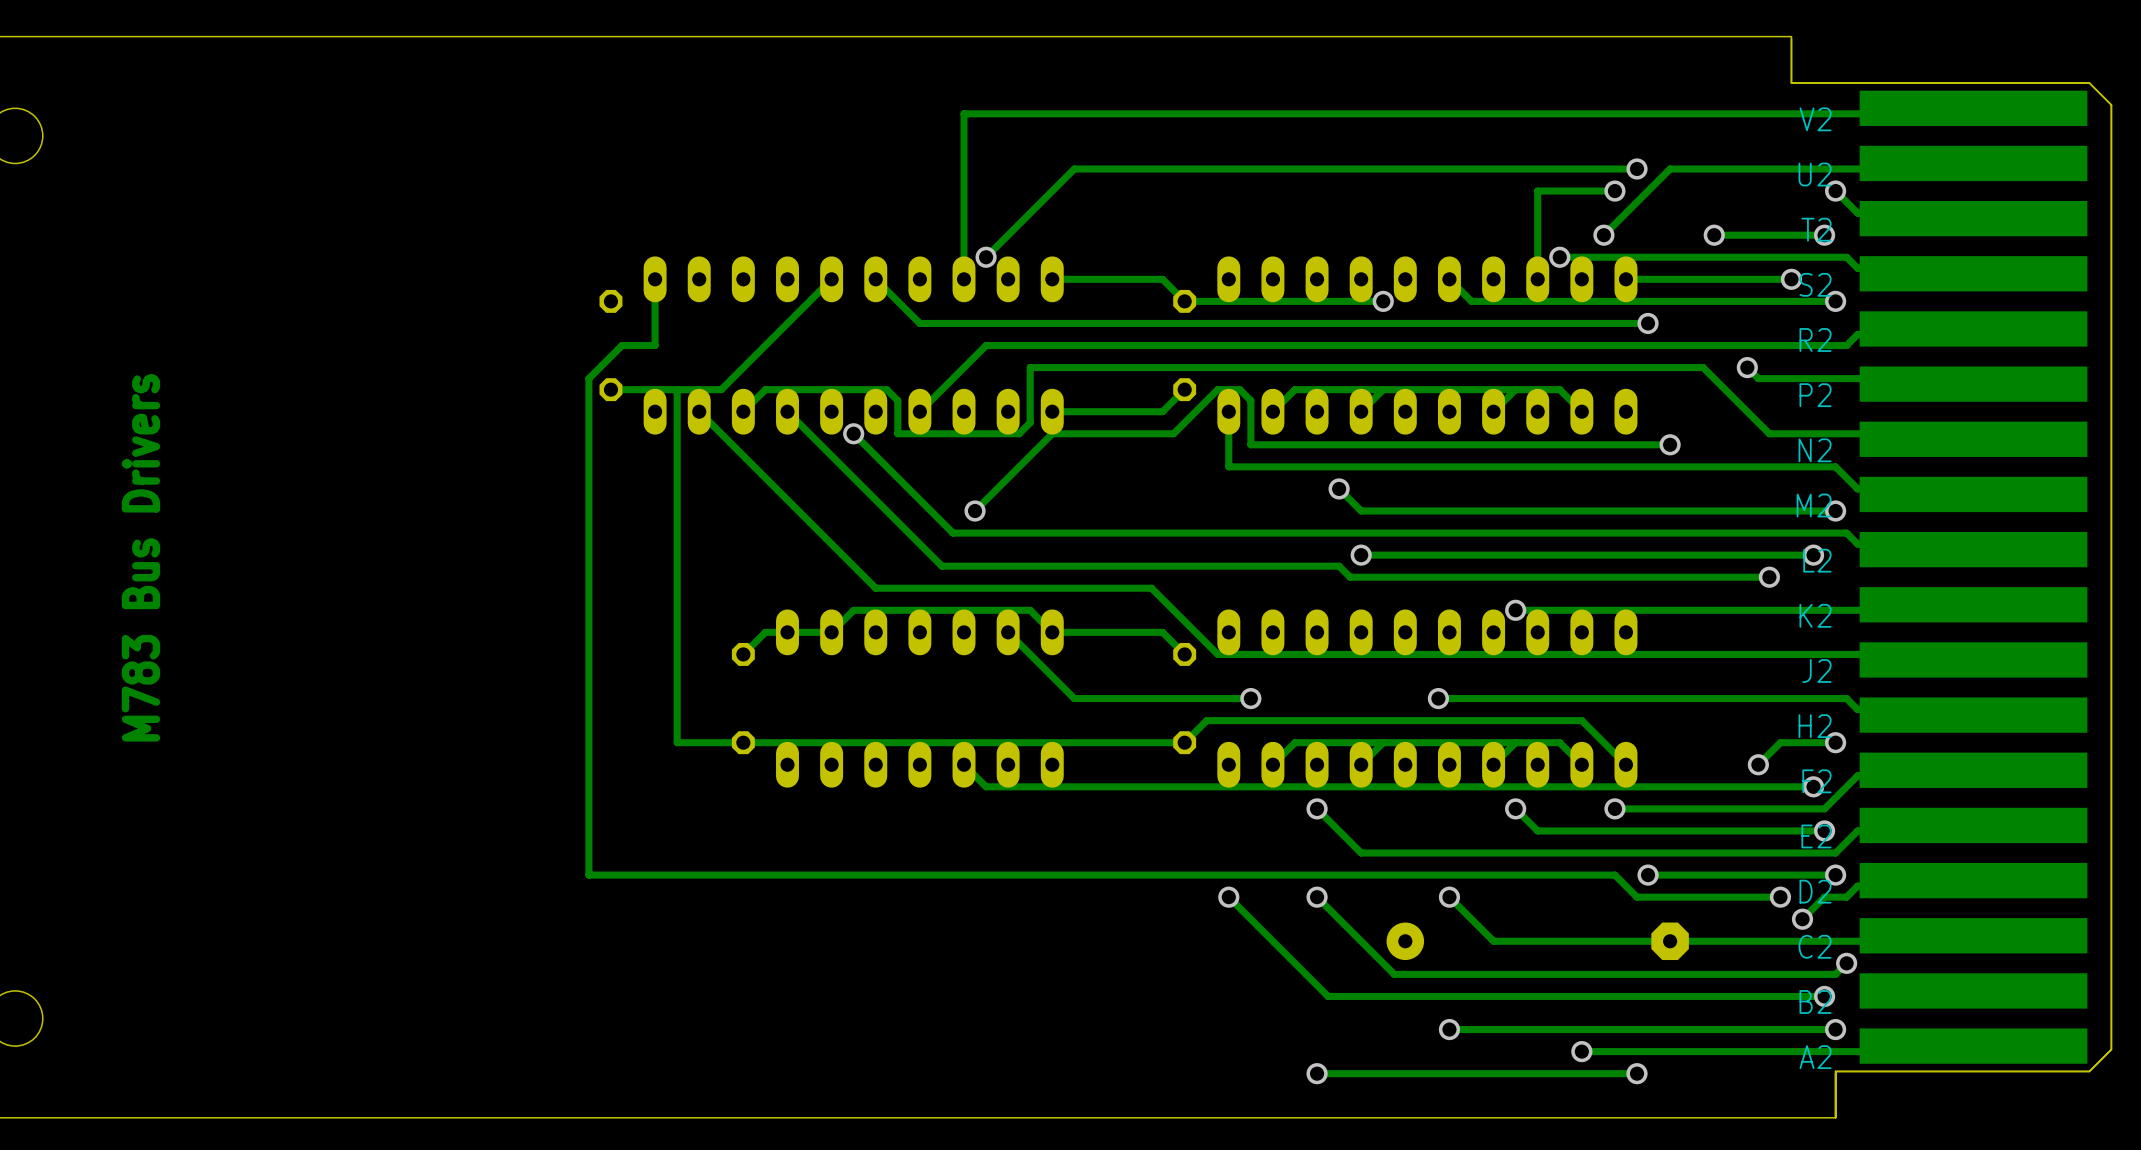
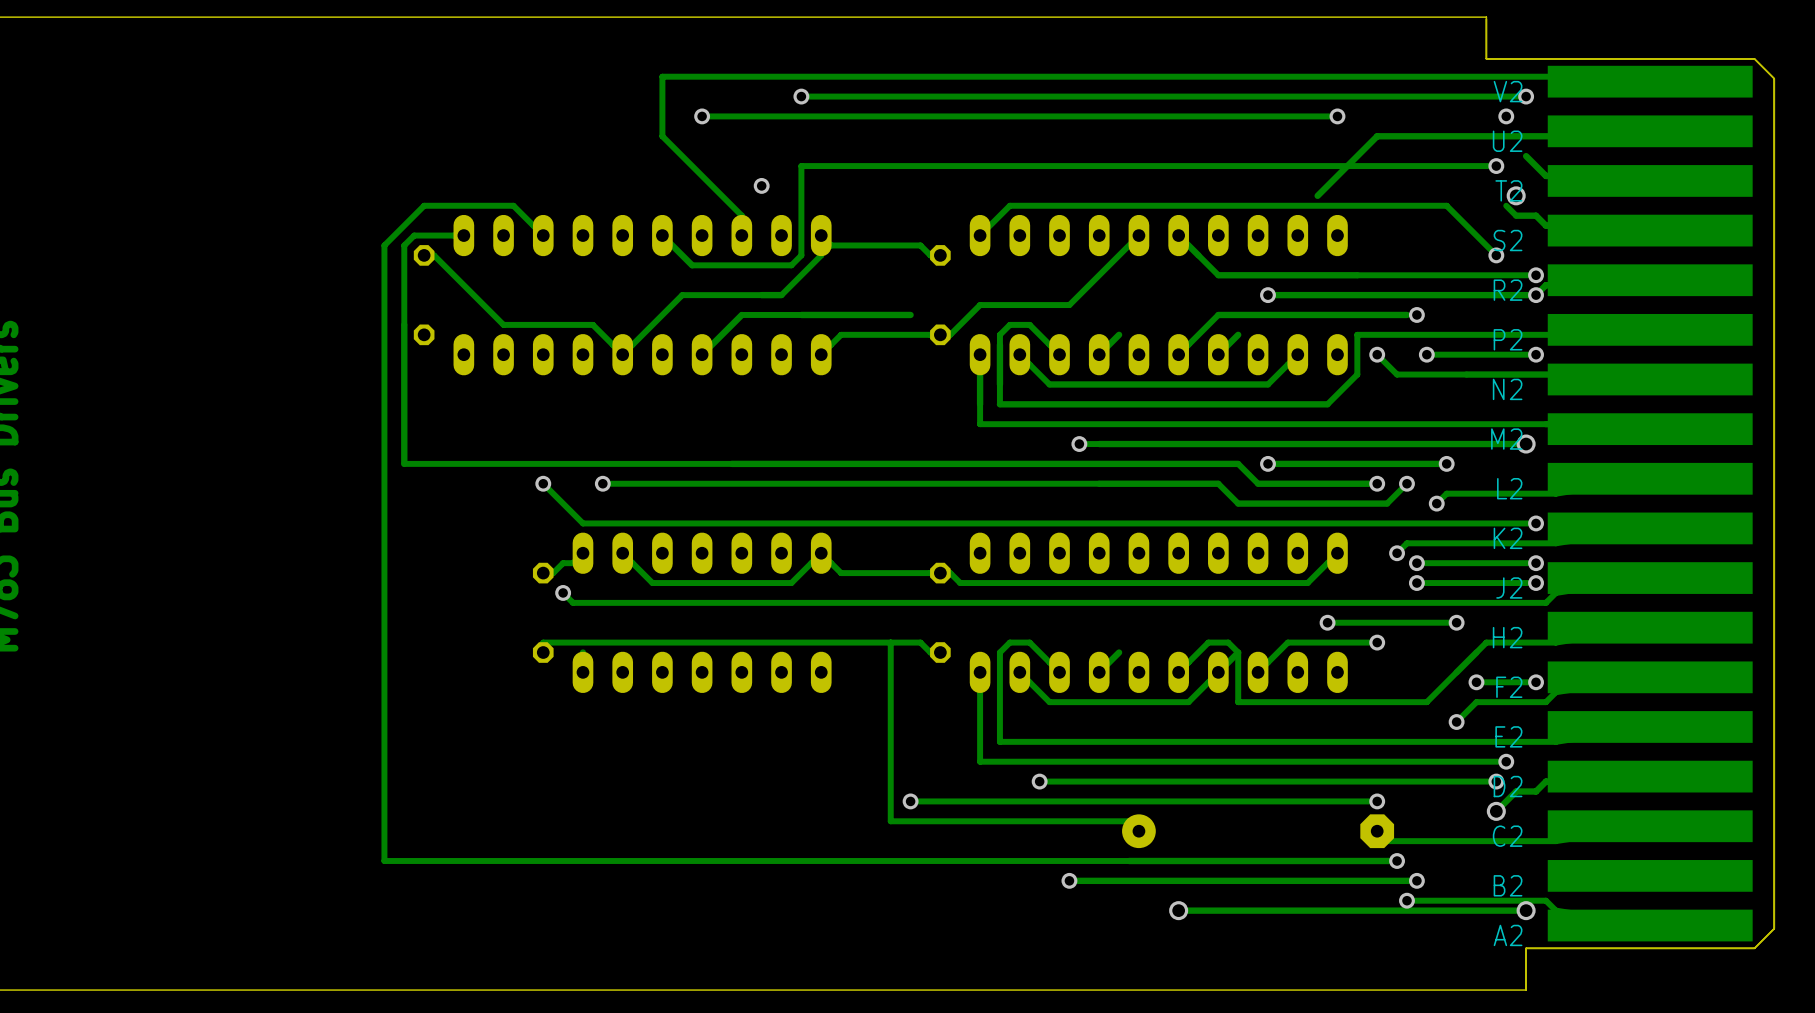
track: (1973, 108) (1967, 113) (964, 113) (964, 257) -> (1650, 81) (1555, 76) (662, 76) (662, 136) (741, 215)
via: none -> (801, 96)
track: none -> (1526, 96) (801, 96)
via: none -> (1526, 96)
via: none -> (702, 116)
track: none -> (1337, 116) (702, 116)
via: none -> (1337, 116)
via: none -> (1506, 116)
track: (1637, 168) (1074, 168) (986, 257) -> none
via: (1637, 168) -> none
track: (1614, 191) (1537, 191) (1537, 279) -> none
via: (1614, 191) -> none
via: (1835, 191) -> none
via: none -> (1496, 166)
via: none -> (761, 185)
via: (1603, 235) -> none
via: (1714, 235) -> none
track: (1824, 235) (1714, 235) -> none
via: (986, 257) -> none
via: (1559, 257) -> none
track: (1824, 257) (1559, 257) -> (1516, 215) (1506, 205)
track: (655, 279) (655, 345) (622, 345) (588, 378) -> (463, 235) (414, 235) (404, 245) (404, 324)
track: (831, 279) (721, 389) (610, 389) -> none
track: (1052, 279) (1162, 279) (1184, 301) (1383, 301) -> none
track: none -> (980, 235) (1009, 205) (1446, 205) (1496, 255)
track: (1791, 279) (1625, 279) -> none
via: (1791, 279) -> none
track: none -> (424, 255) (434, 255) (503, 324) (592, 324) (622, 354) (682, 295) (761, 295)
via: (1383, 301) -> none
via: none -> (1496, 255)
track: (1835, 301) (1471, 301) -> (1218, 275) (1198, 255)
via: (1835, 301) -> none
track: (908, 312) (919, 323) (1493, 323) -> (692, 265) (791, 265) (801, 255) (801, 166) (1496, 166)
via: (1648, 323) -> none
track: none -> (1536, 275) (1357, 275)
via: none -> (1536, 275)
track: (986, 345) (964, 367) -> (801, 314) (741, 314)
track: (1548, 345) (1008, 345) -> (940, 255) (930, 255) (920, 245) (831, 245) (821, 235) (821, 255) (781, 295)
via: none -> (1267, 295)
via: none -> (1536, 295)
track: (1030, 367) (1030, 422) (1019, 433) (897, 433) (897, 400) (886, 389) (765, 389) (743, 411) -> none
track: (1493, 367) (1151, 367) -> (1218, 314) (1178, 354)
track: (1703, 367) (1769, 433) -> (1377, 354) (1397, 374) (1466, 374)
via: none -> (1416, 314)
track: (1747, 367) (1758, 378) (1967, 378) (1973, 384) -> none
via: (1747, 367) -> none
track: (677, 389) (677, 742) (1173, 742) -> (543, 652) (543, 642) (920, 642) (930, 652)
track: (1184, 389) (1162, 411) (1052, 411) -> (1138, 235) (1069, 305) (980, 305) (950, 334) (841, 334) (821, 354)
track: (1250, 400) (1239, 389) (1217, 389) (1173, 433) (1052, 433) (975, 511) -> (999, 344) (999, 334) (1009, 324) (1029, 324) (1059, 354)
track: (699, 411) (875, 588) (1151, 588) (1217, 654) (1967, 654) (1973, 659) -> (563, 592) (573, 602) (1545, 602) (1555, 592) (1650, 578)
track: (787, 411) (941, 566) (1339, 566) (1350, 577) (1515, 577) -> none
track: (1581, 411) (1559, 389) (1295, 389) (1272, 411) -> none
via: none -> (1377, 354)
via: none -> (1426, 354)
track: none -> (1536, 354) (1426, 354)
via: none -> (1536, 354)
track: (853, 433) (952, 533) -> (404, 463) (731, 463)
via: (853, 433) -> none
track: (1306, 444) (1250, 444) -> (1049, 384) (1019, 354)
track: (1670, 444) (1548, 444) -> (1297, 354) (1267, 384)
via: (1670, 444) -> none
track: none -> (980, 404) (980, 424) (1545, 424)
track: (1250, 466) (1228, 466) -> (999, 404) (999, 384)
track: (1614, 466) (1835, 466) (1857, 488) -> (1327, 404) (1357, 374) (1357, 334) (1555, 334) (1650, 329)
track: (1339, 488) (1361, 511) -> (1079, 444) (1099, 444)
via: (1339, 488) -> none
via: (975, 511) -> none
via: none -> (1079, 444)
track: (588, 533) (588, 875) (1614, 875) (1637, 897) (1780, 897) -> none
track: (1548, 533) (1515, 533) -> (1258, 483) (1238, 463)
via: none -> (1267, 463)
track: (1747, 533) (1846, 533) (1857, 544) (1967, 544) (1973, 549) -> (1436, 503) (1446, 493) (1555, 493) (1650, 478)
via: none -> (1446, 463)
track: none -> (543, 483) (582, 523) (1536, 523)
via: none -> (543, 483)
via: none -> (602, 483)
track: none -> (1099, 483) (602, 483)
via: (1361, 555) -> none
track: (1537, 555) (1493, 555) -> (1238, 503) (1218, 483)
via: none -> (1377, 483)
via: none -> (1406, 483)
track: (1813, 555) (1670, 555) -> (1456, 622) (1327, 622)
via: (1813, 555) -> none
via: none -> (1436, 503)
track: (1769, 577) (1681, 577) -> (1406, 483) (1387, 503)
via: (1769, 577) -> none
via: none -> (1536, 523)
track: (1973, 604) (1967, 610) (1515, 610) -> (1650, 528) (1555, 543) (1406, 543) (1397, 553)
via: (1515, 610) -> none
track: (1008, 632) (1074, 698) (1250, 698) -> none
track: none -> (1337, 553) (1307, 583) (960, 583) (950, 573) (841, 573) (821, 553) (791, 583) (652, 583) (622, 553)
via: none -> (1397, 553)
via: none -> (1416, 563)
track: none -> (1536, 563) (1416, 563)
via: none -> (1536, 563)
track: (1184, 654) (1162, 632) (1052, 632) (1030, 610) (853, 610) (831, 632) (765, 632) (743, 654) -> (582, 553) (573, 563) (563, 563) (553, 573) (543, 573)
via: none -> (1416, 583)
track: none -> (1536, 583) (1416, 583)
via: none -> (1536, 583)
via: none -> (563, 592)
via: (1250, 698) -> none
track: (1438, 698) (1846, 698) (1857, 709) (1967, 709) (1973, 715) -> none
via: (1438, 698) -> none
via: none -> (1327, 622)
via: none -> (1456, 622)
track: none -> (890, 642) (890, 821) (1129, 821) (1138, 831)
track: none -> (1377, 642) (1287, 642) (1258, 672)
via: none -> (1377, 642)
track: (1184, 742) (1206, 720) (1581, 720) (1625, 764) -> none
track: (1835, 742) (1780, 742) -> (1650, 627) (1555, 642) (1486, 642) (1476, 652)
via: (1835, 742) -> none
track: (964, 764) (986, 786) (1813, 786) -> none
track: none -> (980, 672) (980, 761) (1506, 761)
track: (1581, 764) (1559, 742) (1295, 742) (1272, 764) -> (1218, 672) (1188, 702) (1049, 702) (1019, 672)
track: none -> (1456, 672) (1426, 702) (1238, 702) (1238, 652) (1228, 642) (1208, 642) (1178, 672)
via: (1758, 764) -> none
track: (1973, 770) (1967, 775) (1857, 775) (1824, 808) (1614, 808) -> (1650, 677) (1555, 692) (1545, 702) (1476, 702) (1456, 722)
via: none -> (1476, 682)
track: none -> (1536, 682) (1476, 682)
via: none -> (1536, 682)
via: (1813, 786) -> none
track: (1317, 808) (1361, 853) (1835, 853) (1857, 830) (1967, 830) (1973, 825) -> (1059, 672) (1029, 642) (1009, 642) (999, 652) (999, 741) (1555, 741) (1650, 726)
via: (1317, 808) -> none
track: (1515, 808) (1537, 830) (1824, 830) -> none
via: (1515, 808) -> none
via: (1614, 808) -> none
via: none -> (1456, 722)
via: (1824, 830) -> none
via: none -> (1506, 761)
via: (1648, 875) -> none
track: (1835, 875) (1648, 875) -> none
via: (1835, 875) -> none
via: none -> (1039, 781)
track: none -> (1496, 781) (1039, 781)
via: none -> (1496, 781)
track: (1228, 897) (1328, 996) -> none
via: (1228, 897) -> none
track: (1317, 897) (1394, 974) -> (543, 235) (513, 205) (424, 205) (384, 245) (384, 860) (1129, 860)
via: (1317, 897) -> none
track: (1449, 897) (1493, 941) (1967, 941) (1973, 935) -> (1377, 831) (1387, 841) (1555, 841) (1650, 826)
via: (1449, 897) -> none
via: (1780, 897) -> none
via: none -> (910, 801)
track: none -> (1377, 801) (910, 801)
via: none -> (1377, 801)
track: (1846, 963) (1835, 974) (1692, 974) -> none
via: (1846, 963) -> none
via: none -> (1397, 860)
via: none -> (1069, 880)
via: none -> (1416, 880)
track: (1824, 996) (1714, 996) -> none
via: (1824, 996) -> none
via: none -> (1406, 900)
track: (1973, 1046) (1967, 1051) (1581, 1051) -> (1650, 925) (1555, 910) (1545, 900) (1406, 900)
via: (1581, 1051) -> none
via: (1317, 1073) -> none
track: (1637, 1073) (1317, 1073) -> none
via: (1637, 1073) -> none

